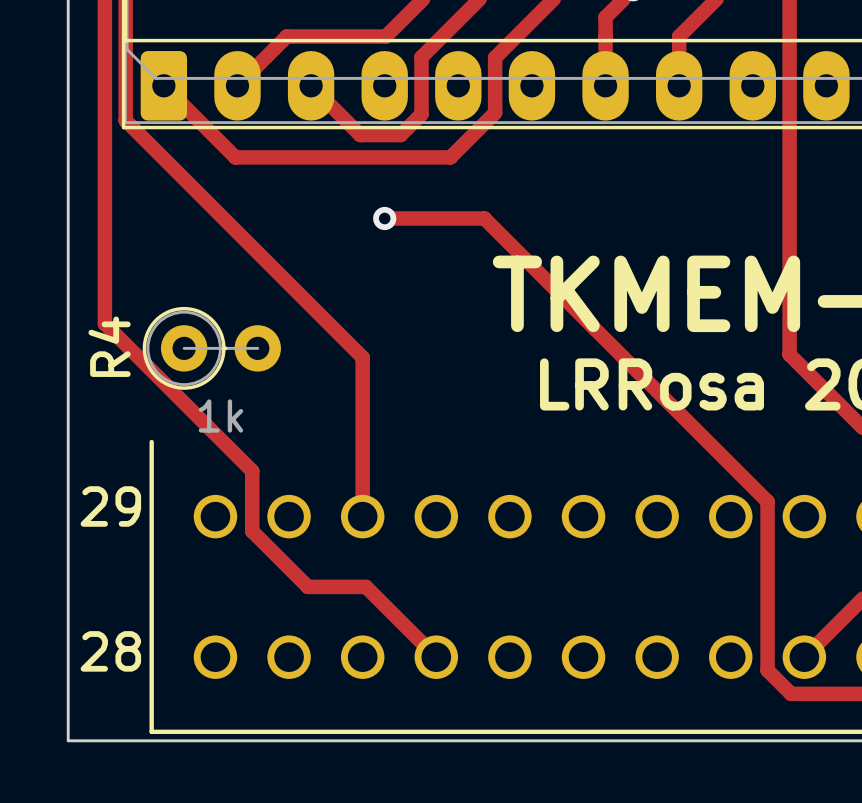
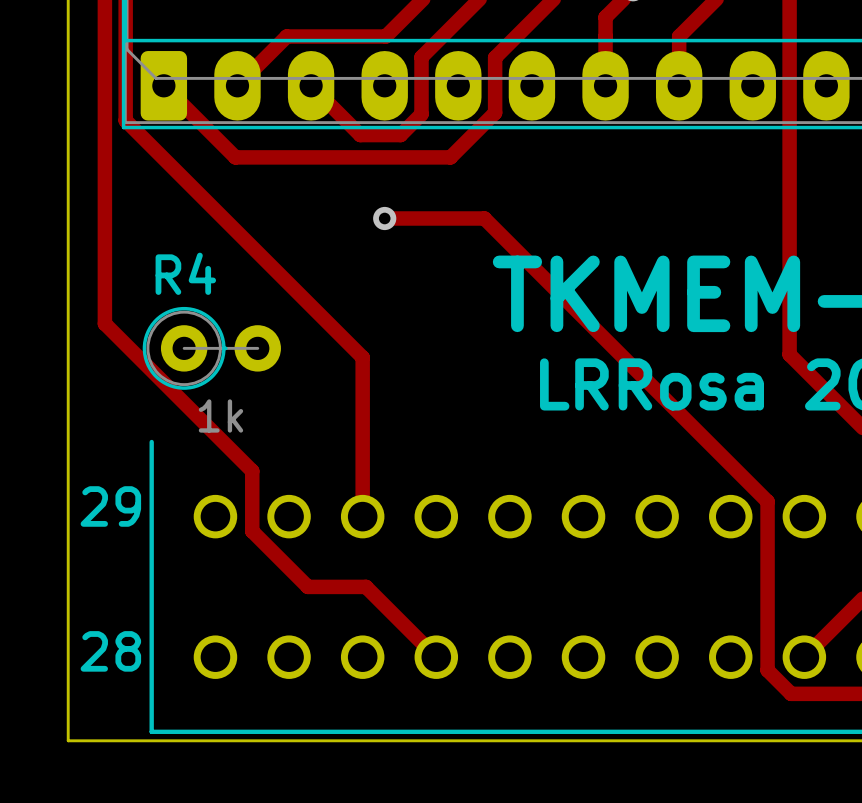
R4 name rotation: 0° (109, 346) -> 90° clockwise (185, 273)
R4 name position: R4 (109, 346) -> R4 (185, 273)

